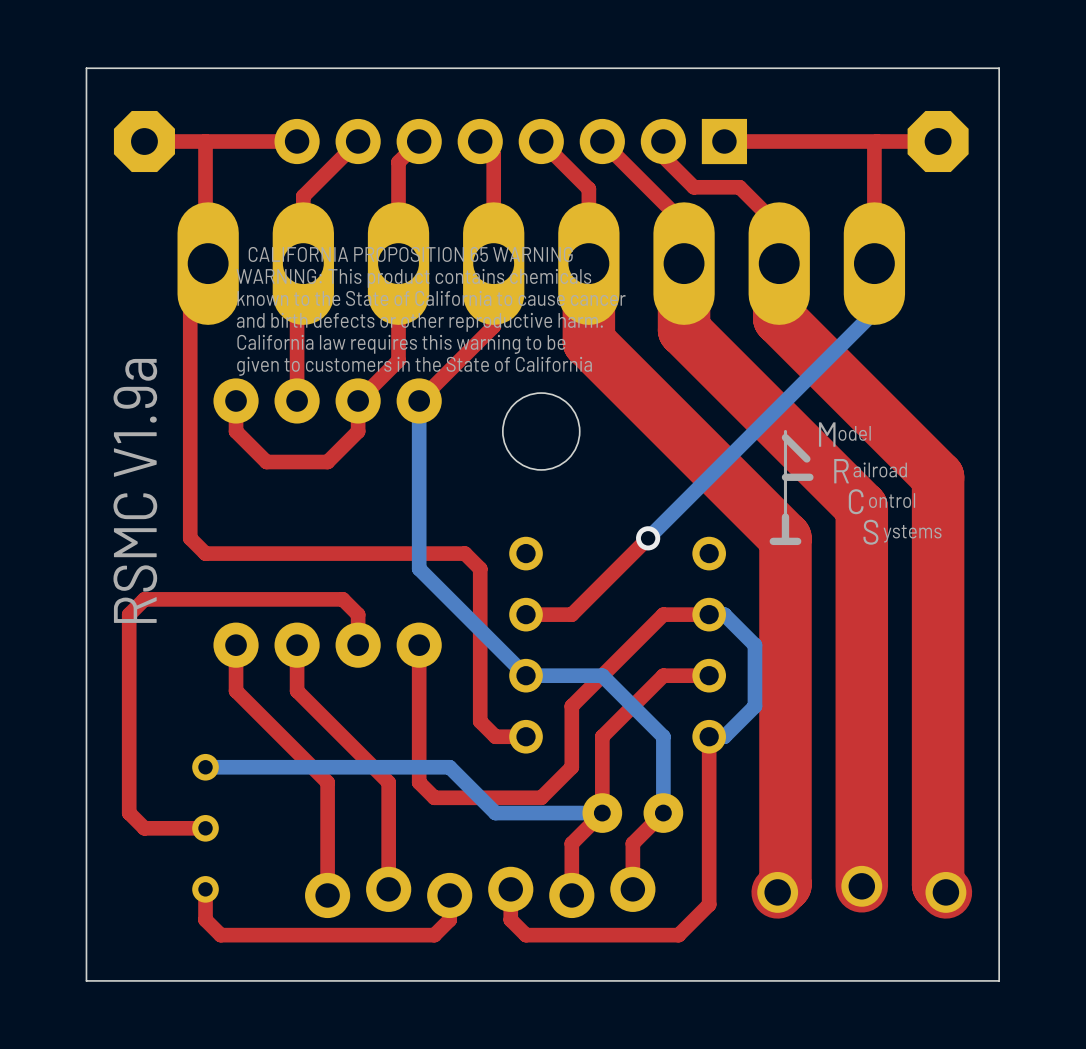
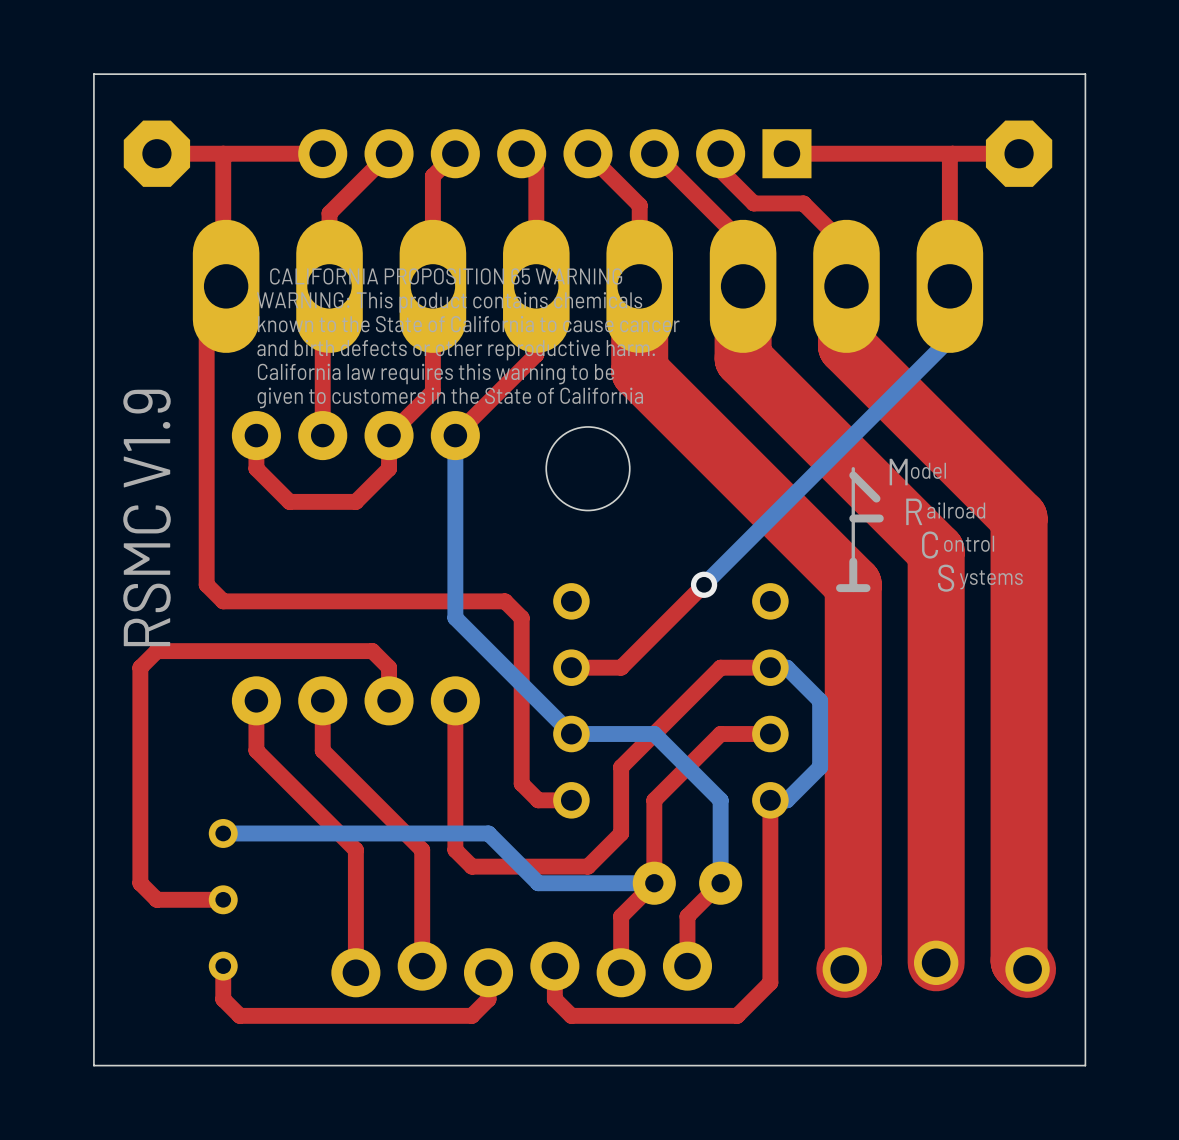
text: RSMC V1.9a (135, 490) -> RSMC V1.9 (147, 517)

